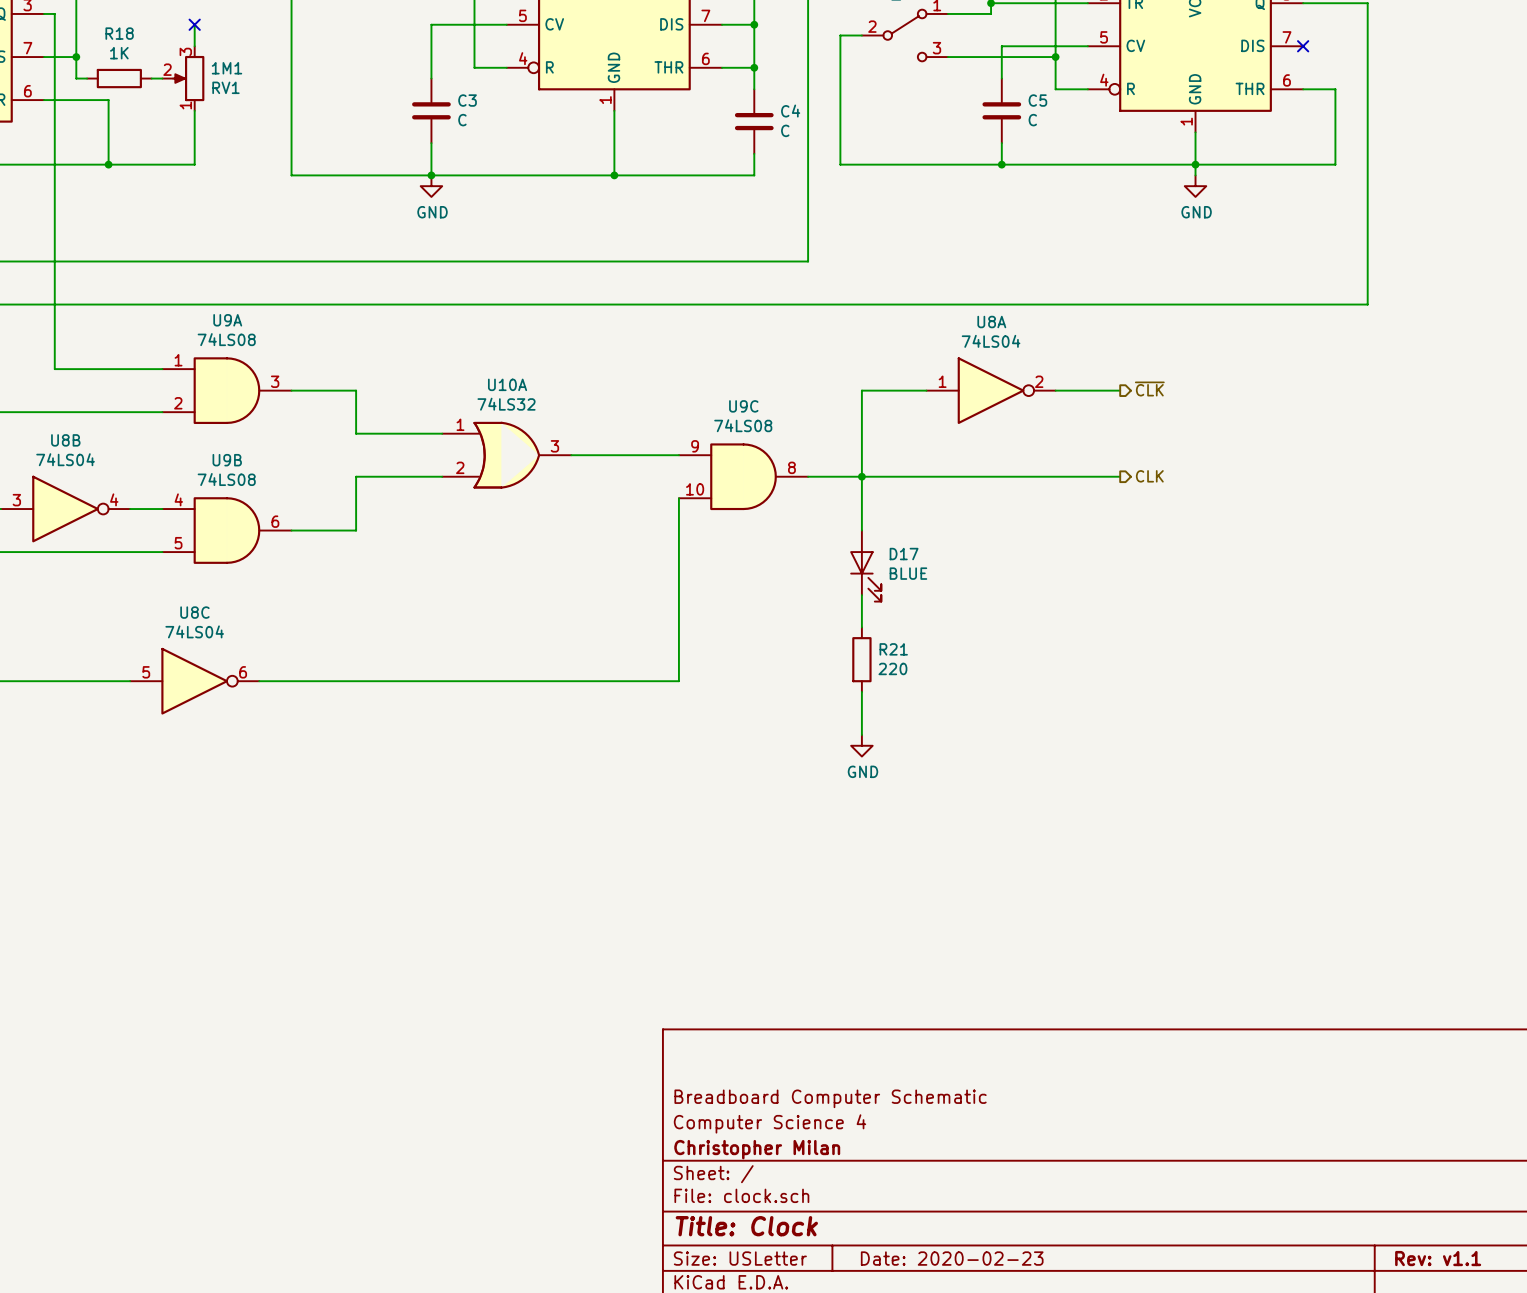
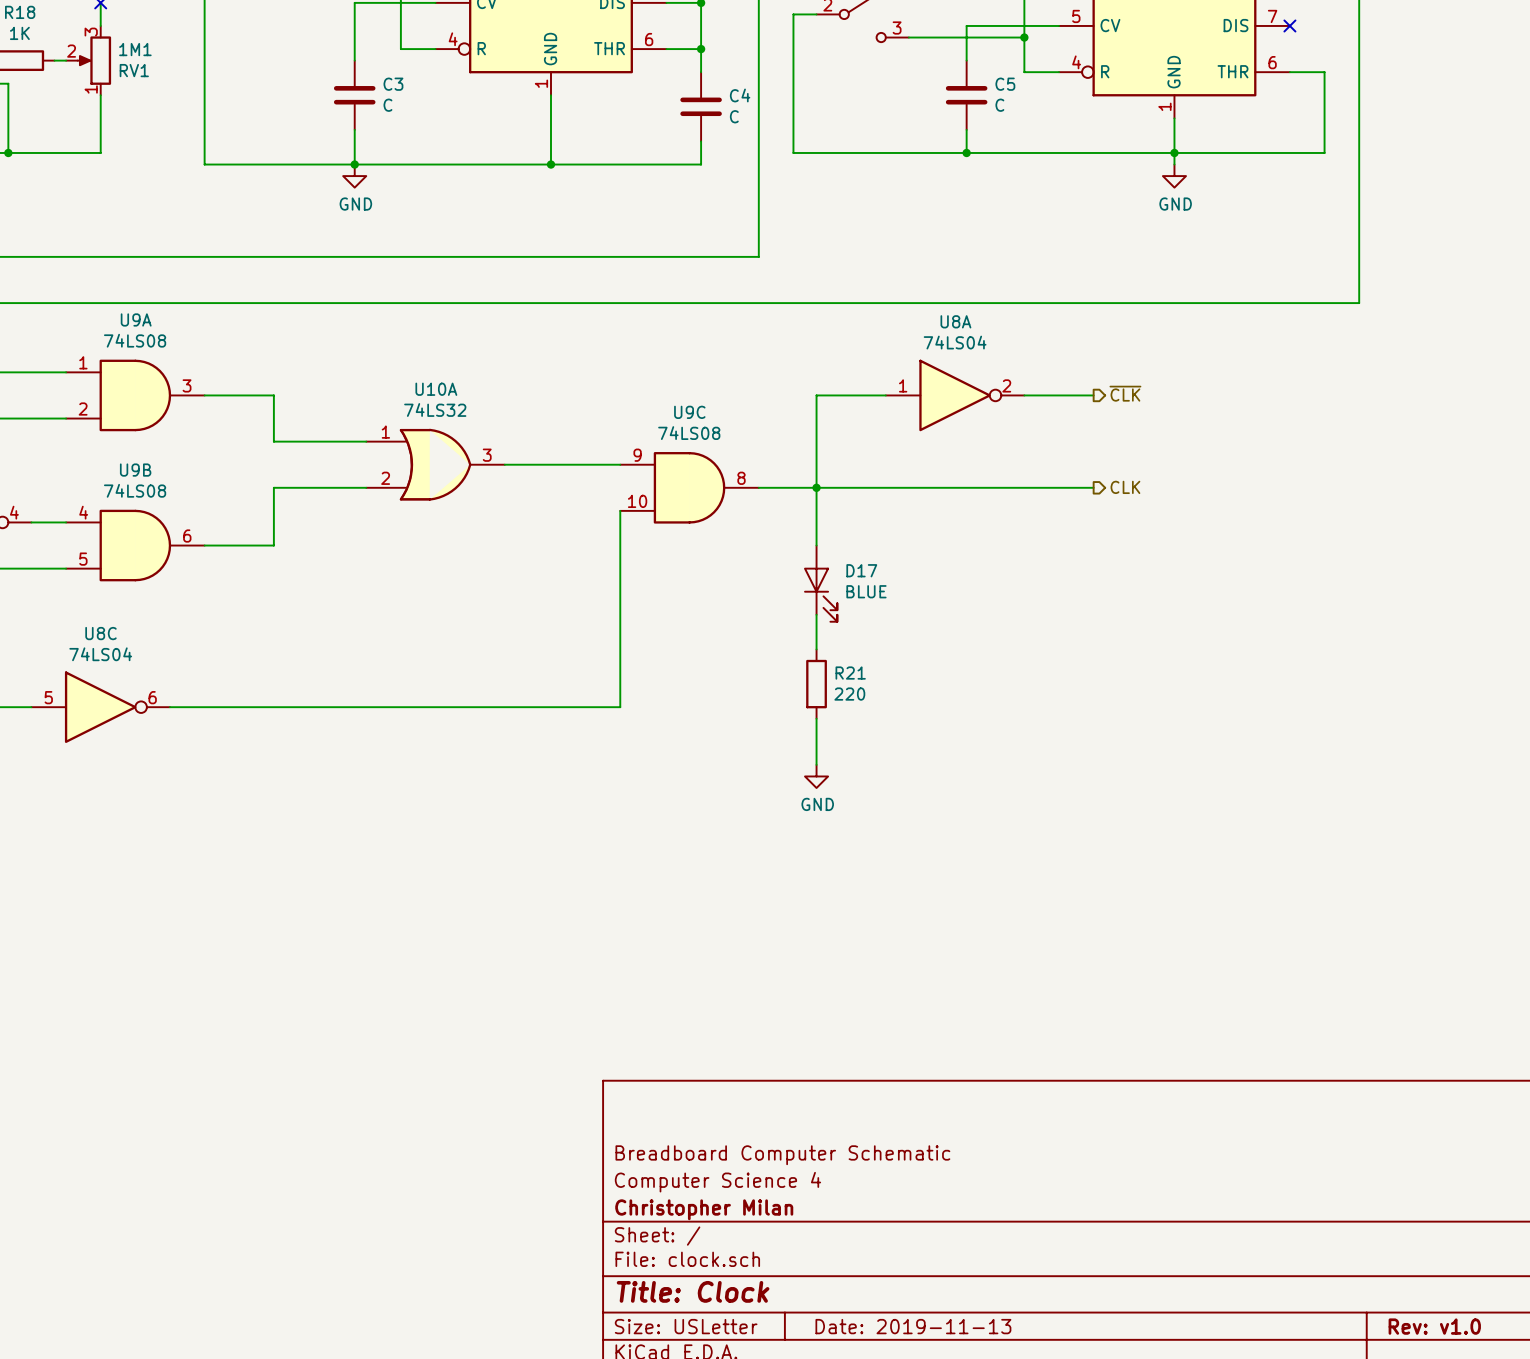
title block: Date: 2020-02-23 (952, 1258) -> Date: 2019-11-13 (913, 1326)
title block: Rev: v1.1 (1438, 1258) -> Rev: v1.0 (1434, 1326)

